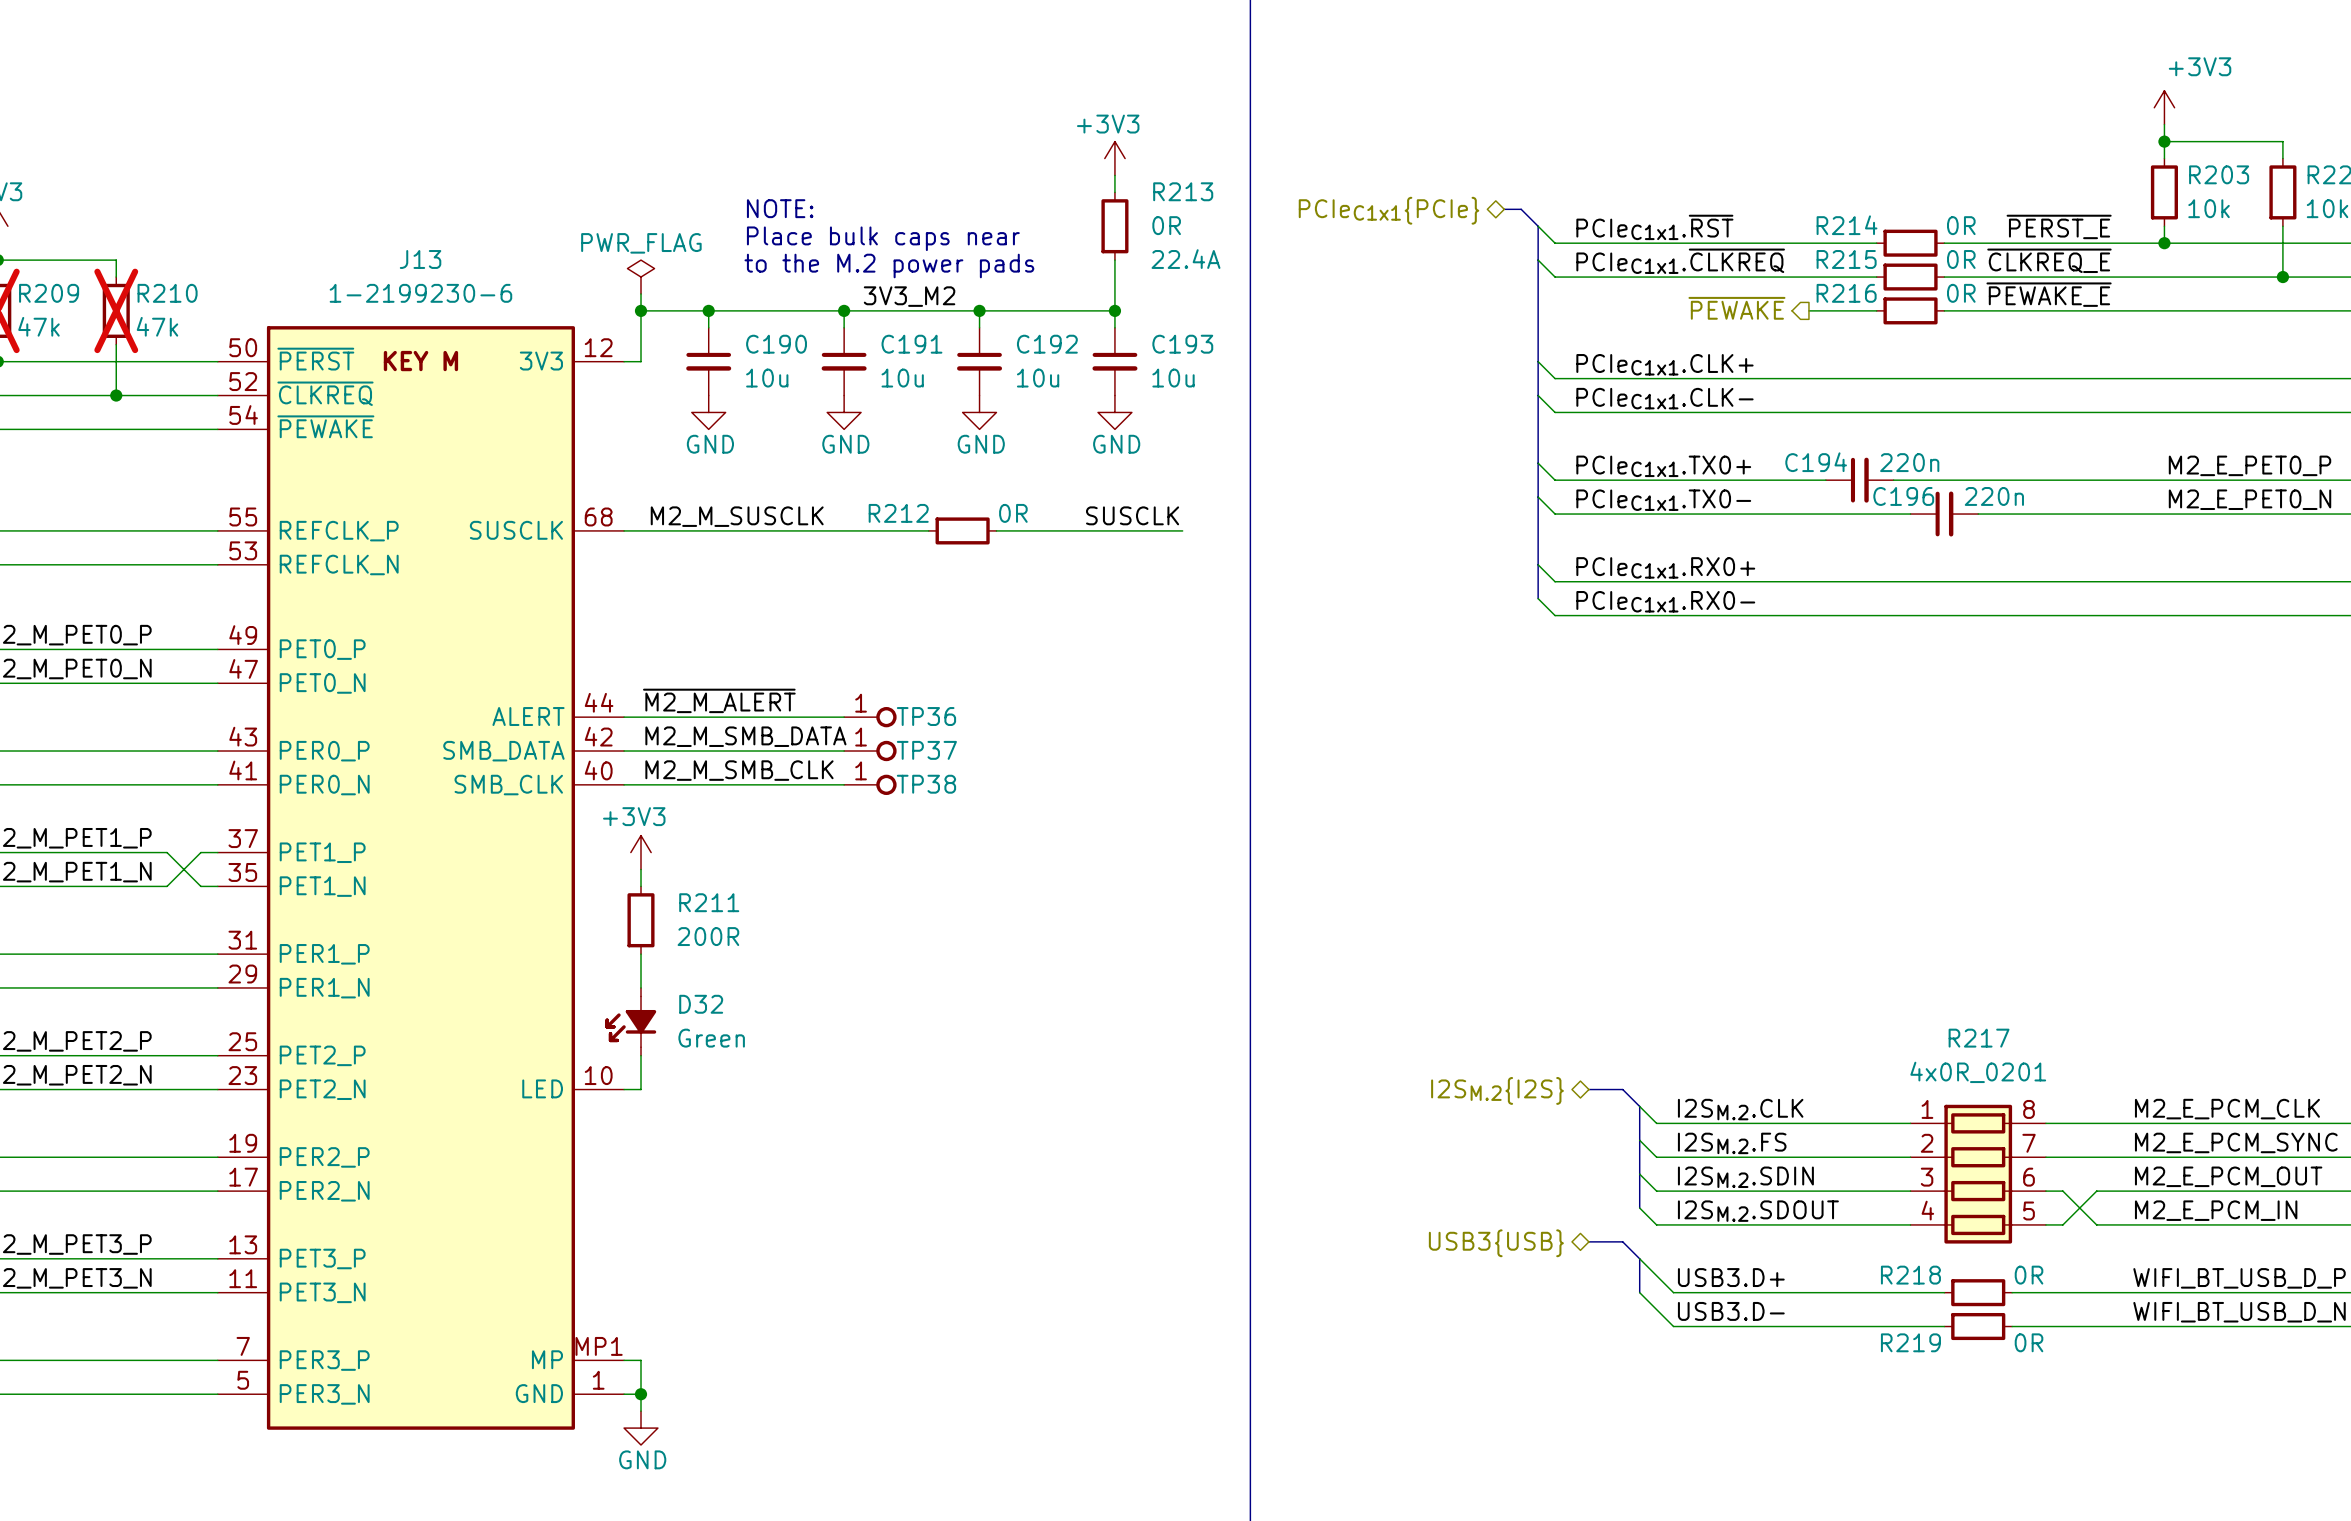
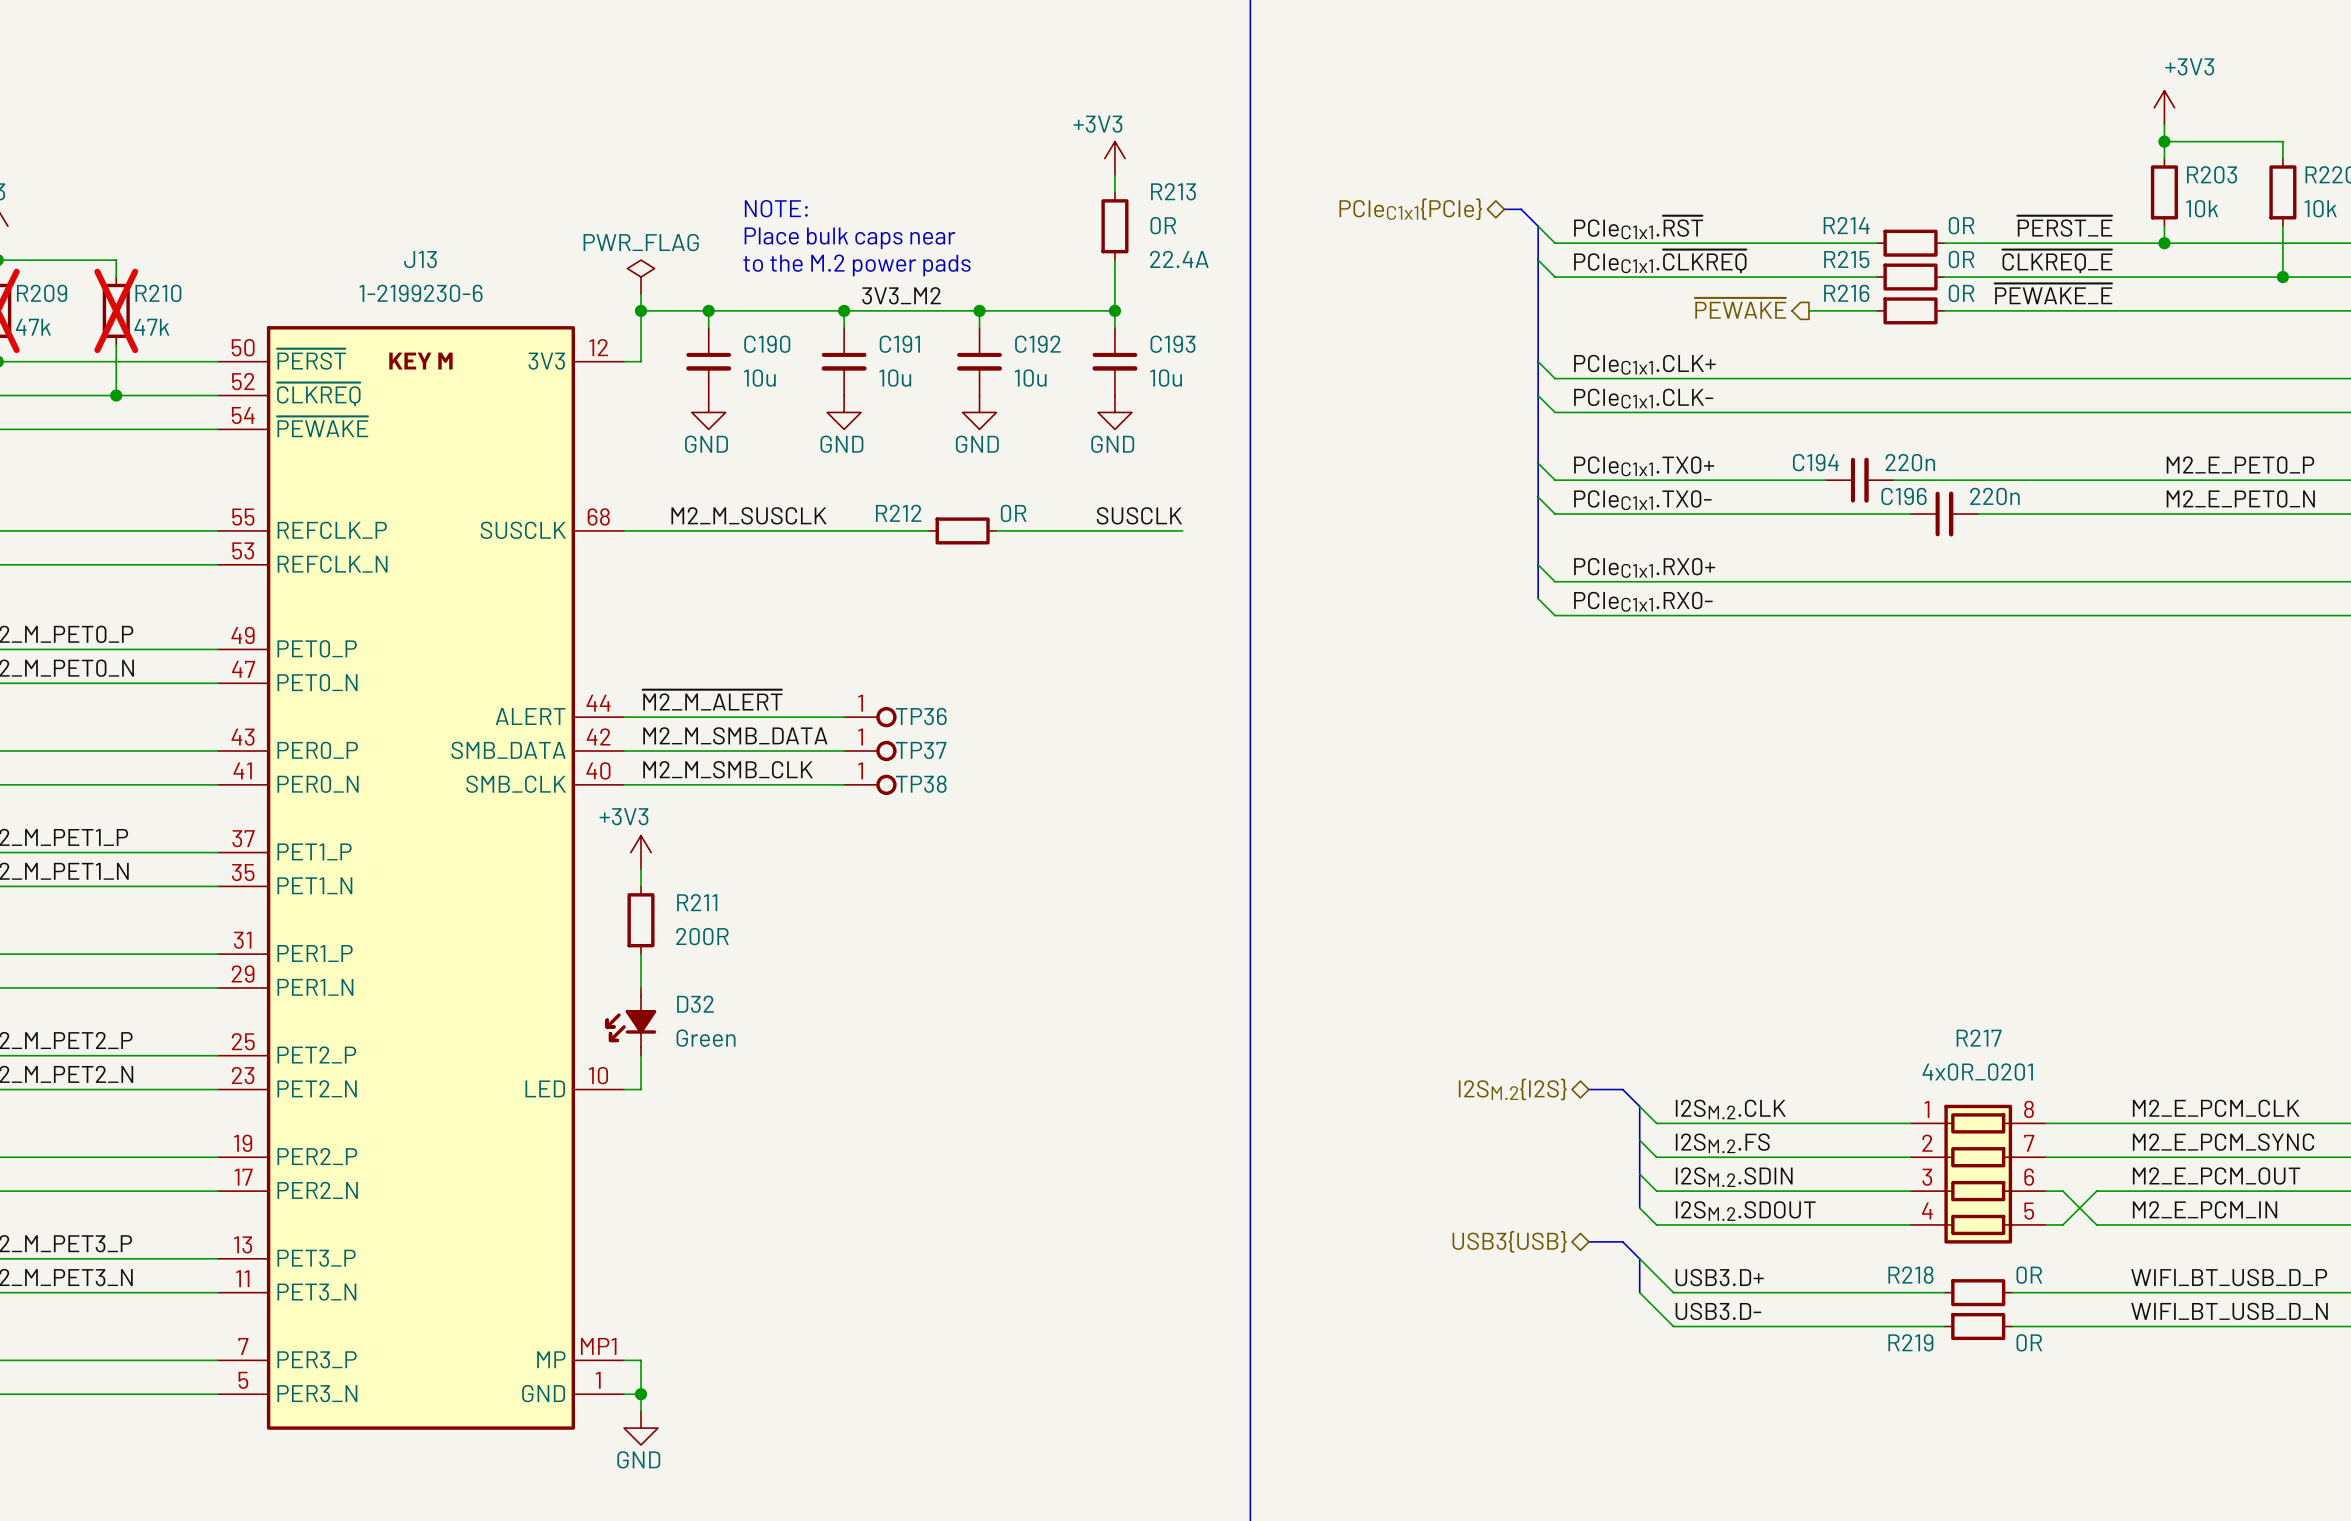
wire: (167, 852) (200, 886) -> (167, 852) (200, 852)
wire: (200, 852) (167, 886) -> (200, 886) (167, 886)

